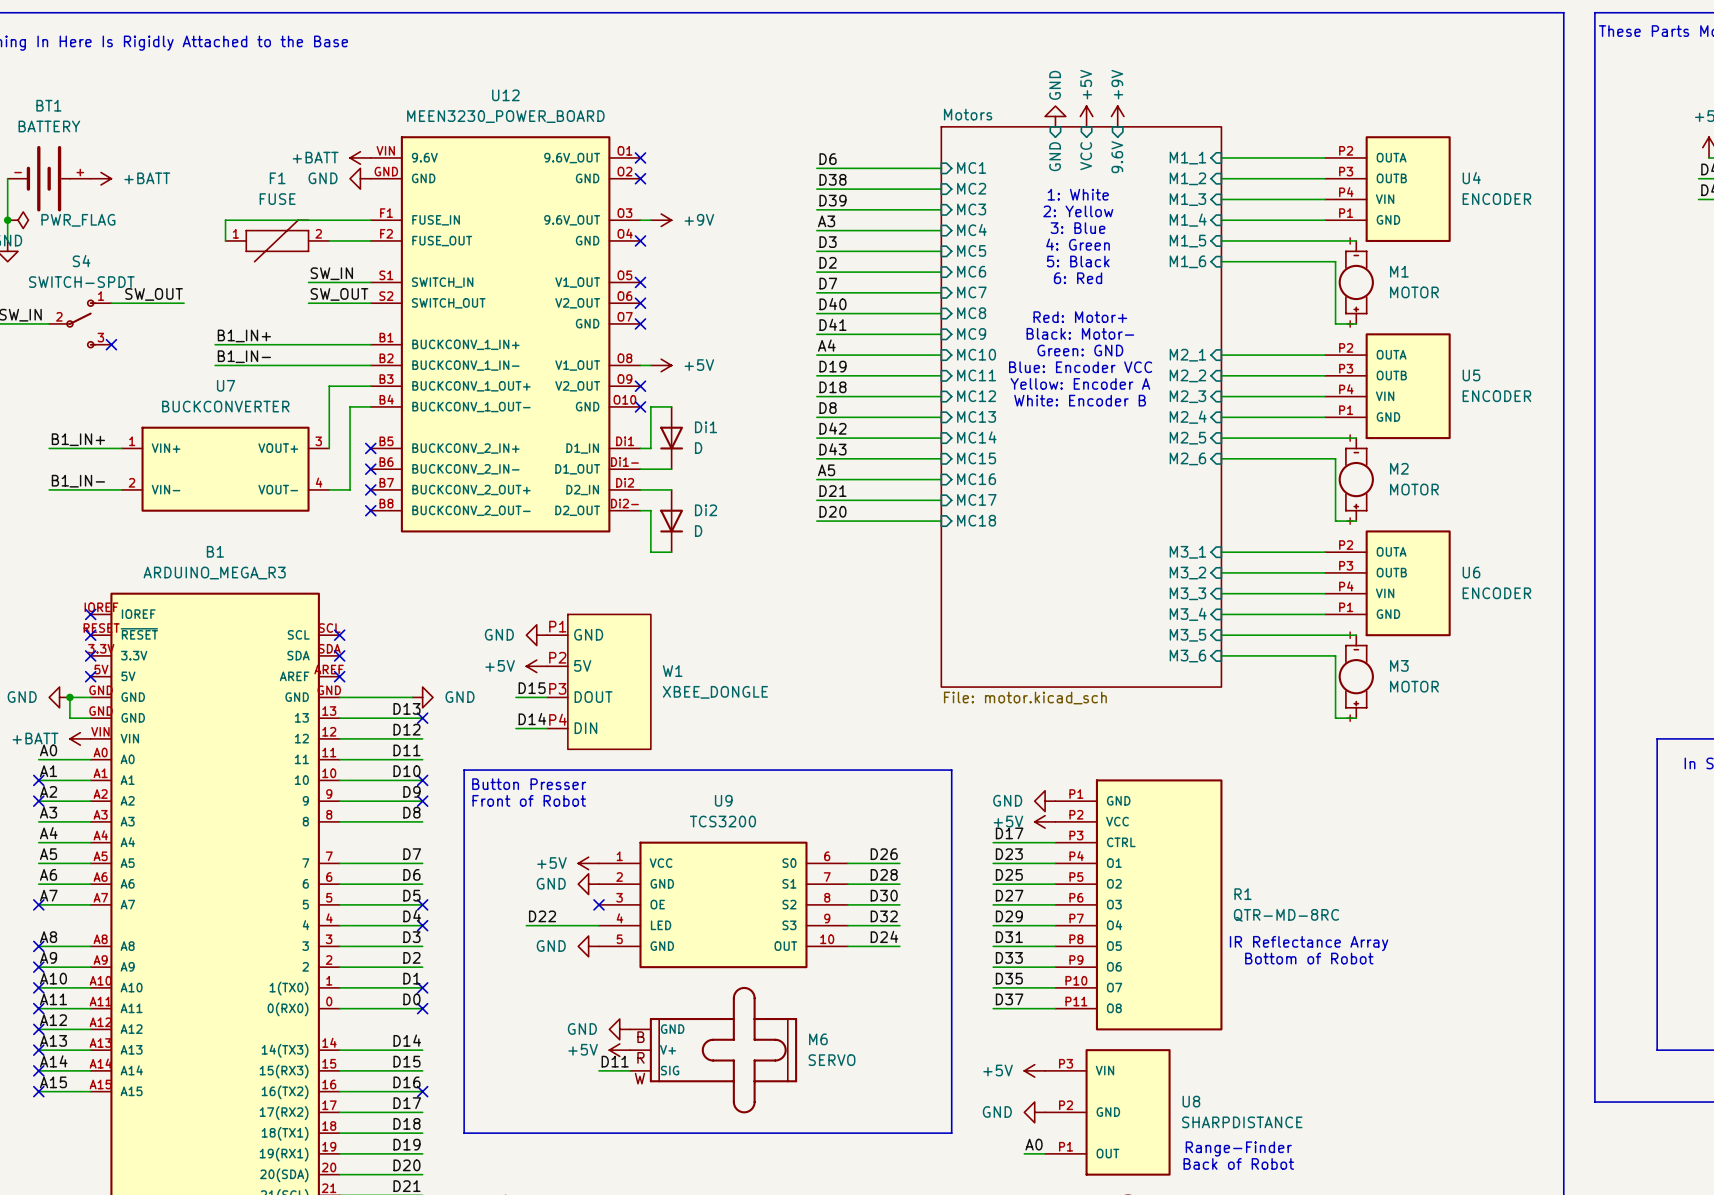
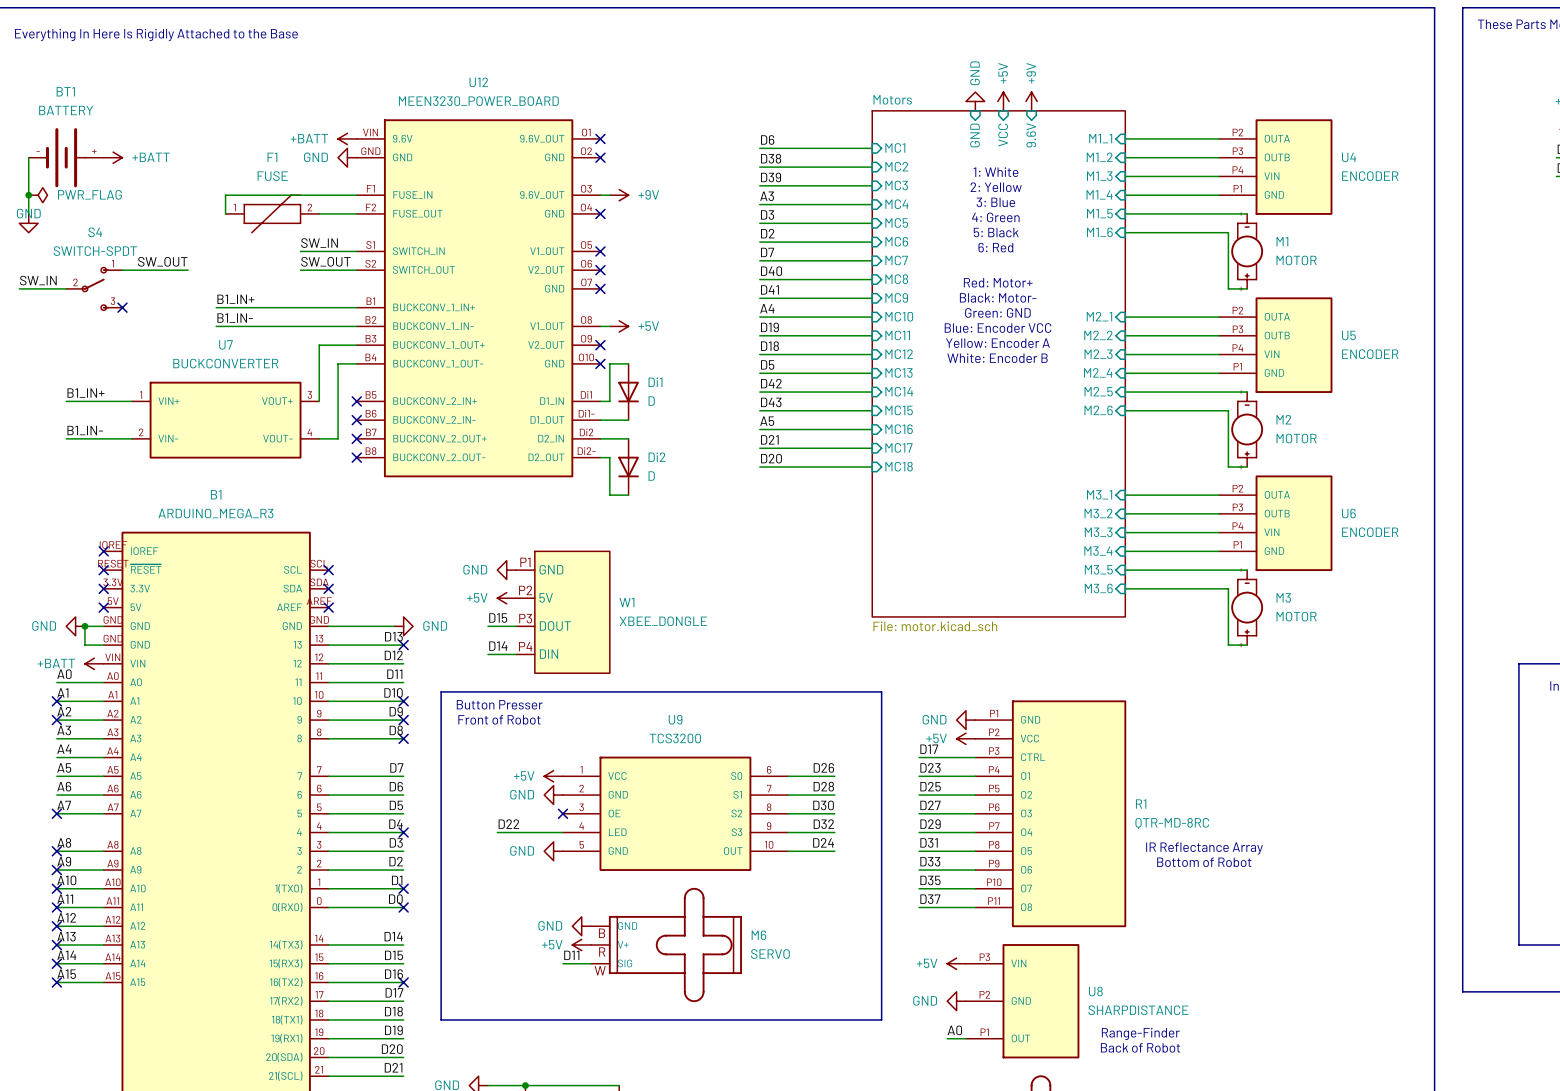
label: D8 (828, 408) -> D5 (767, 364)
no-connect mark: none -> (403, 738)
no-connect mark: (422, 904) -> none

